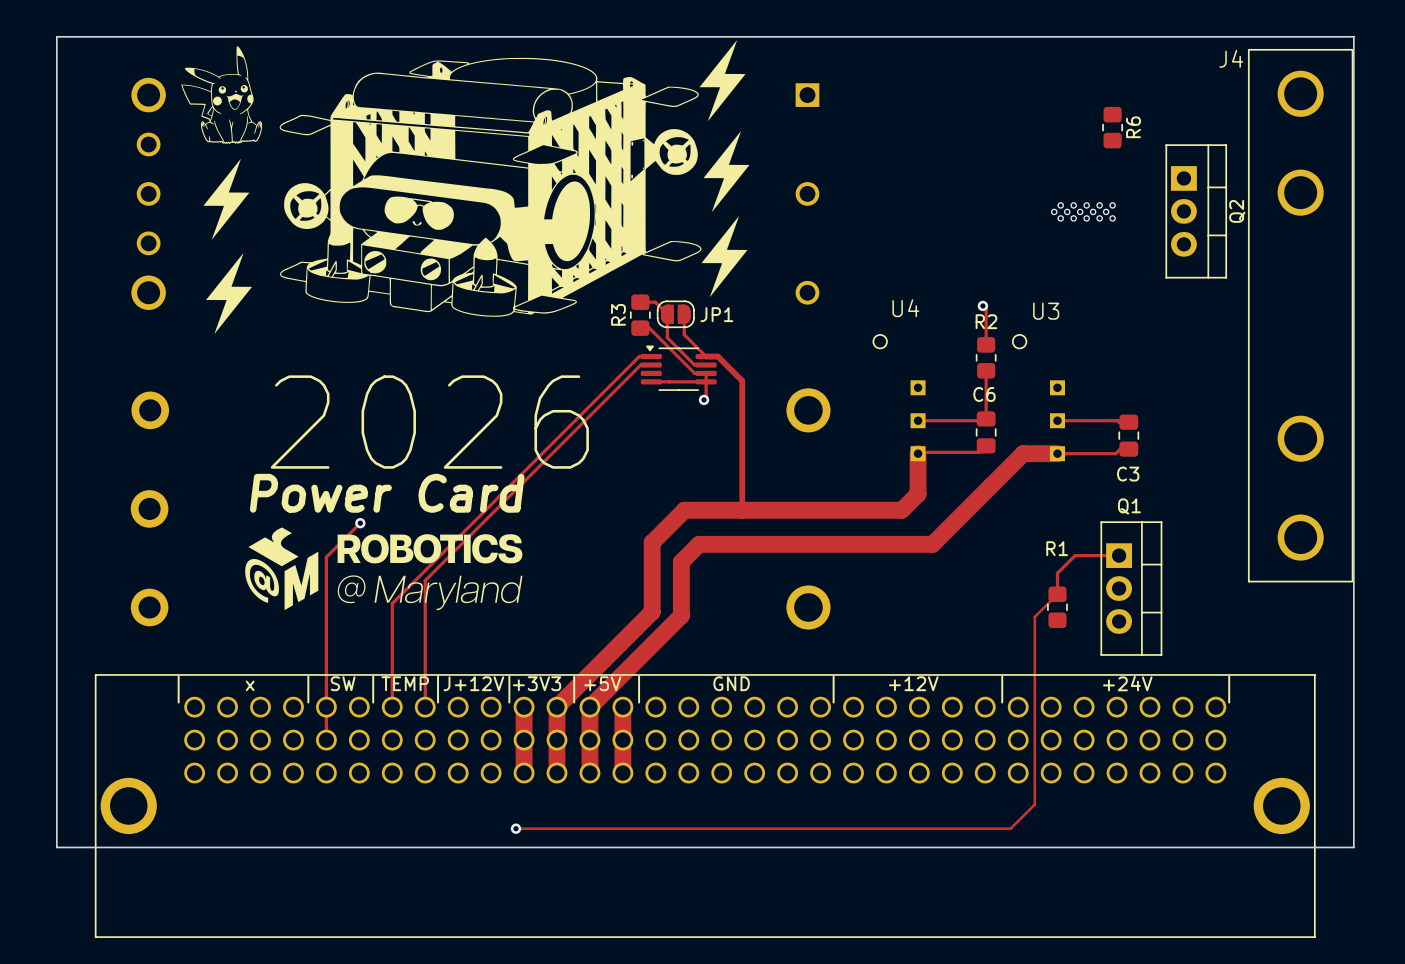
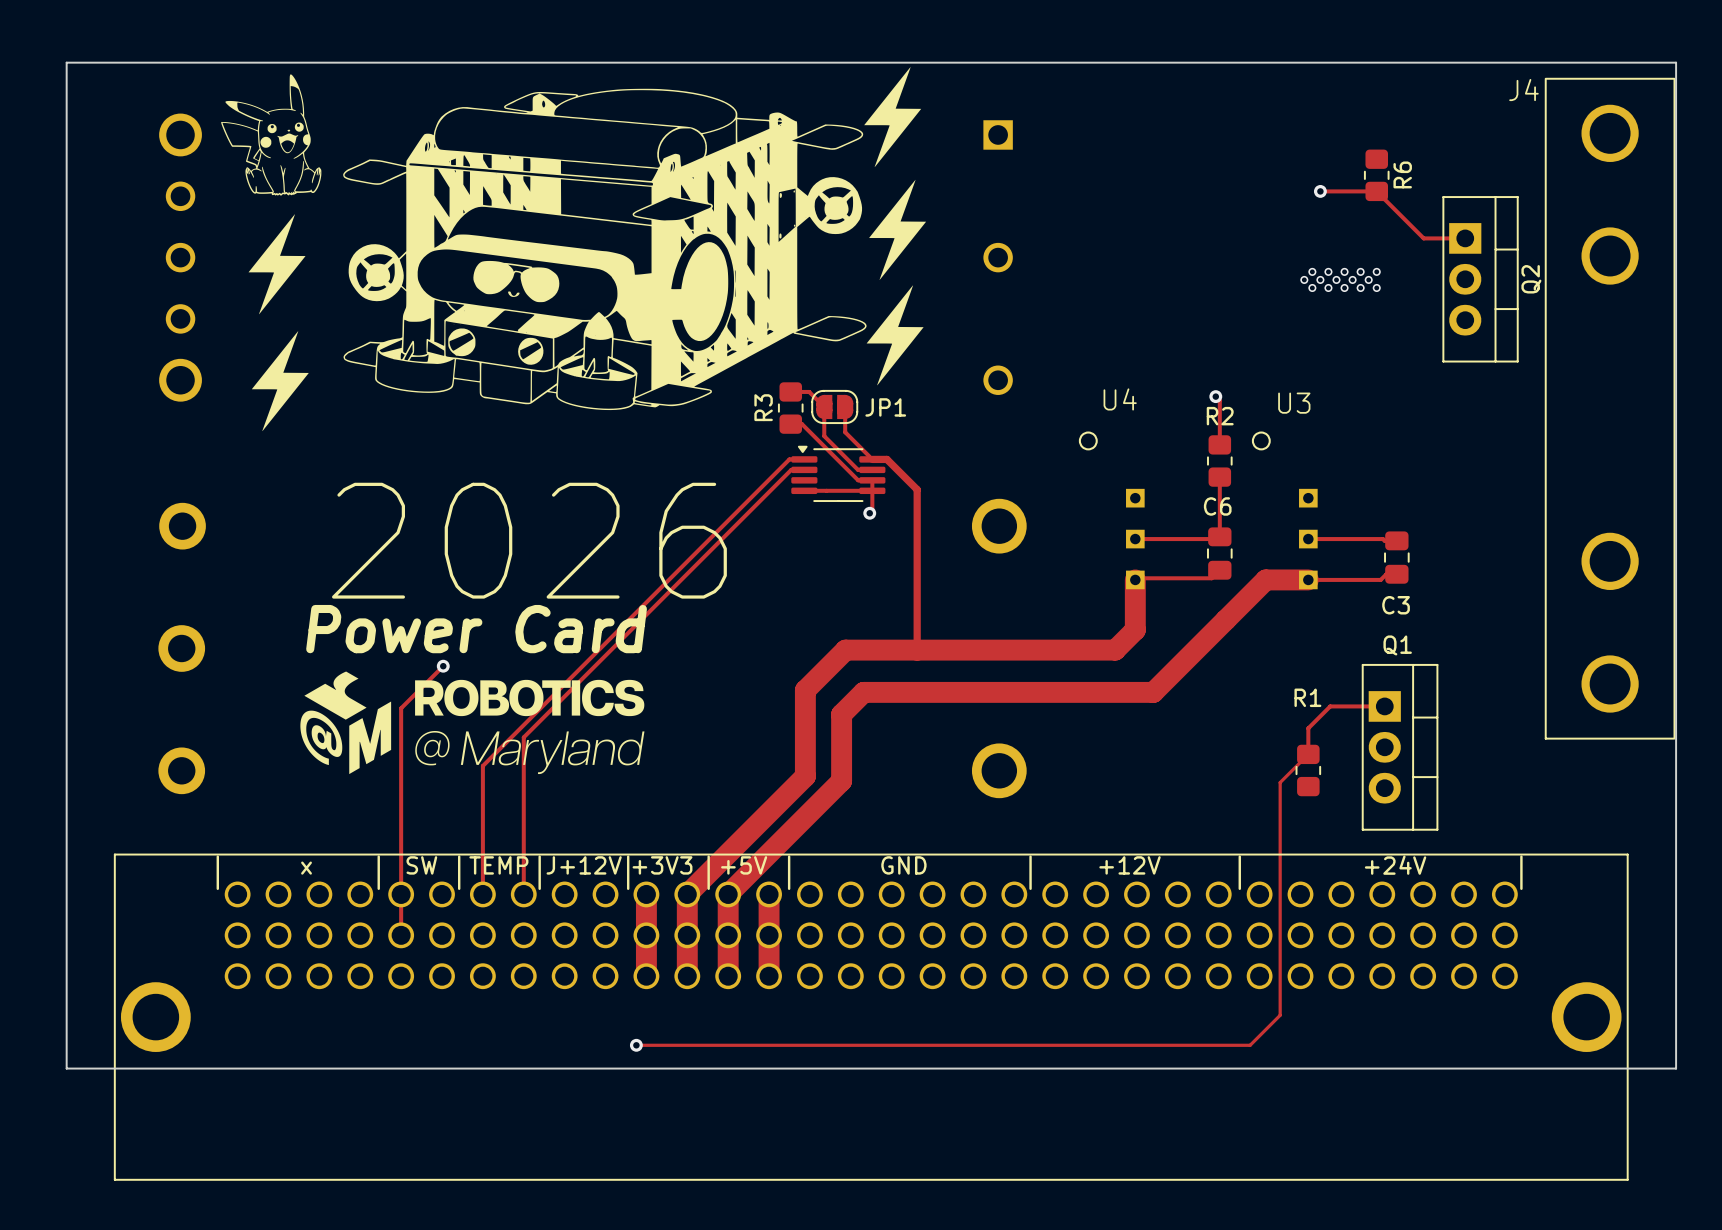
track: none -> (1320, 191) (1376, 191) (1423, 238) (1465, 238)
via: none -> (1320, 191)

